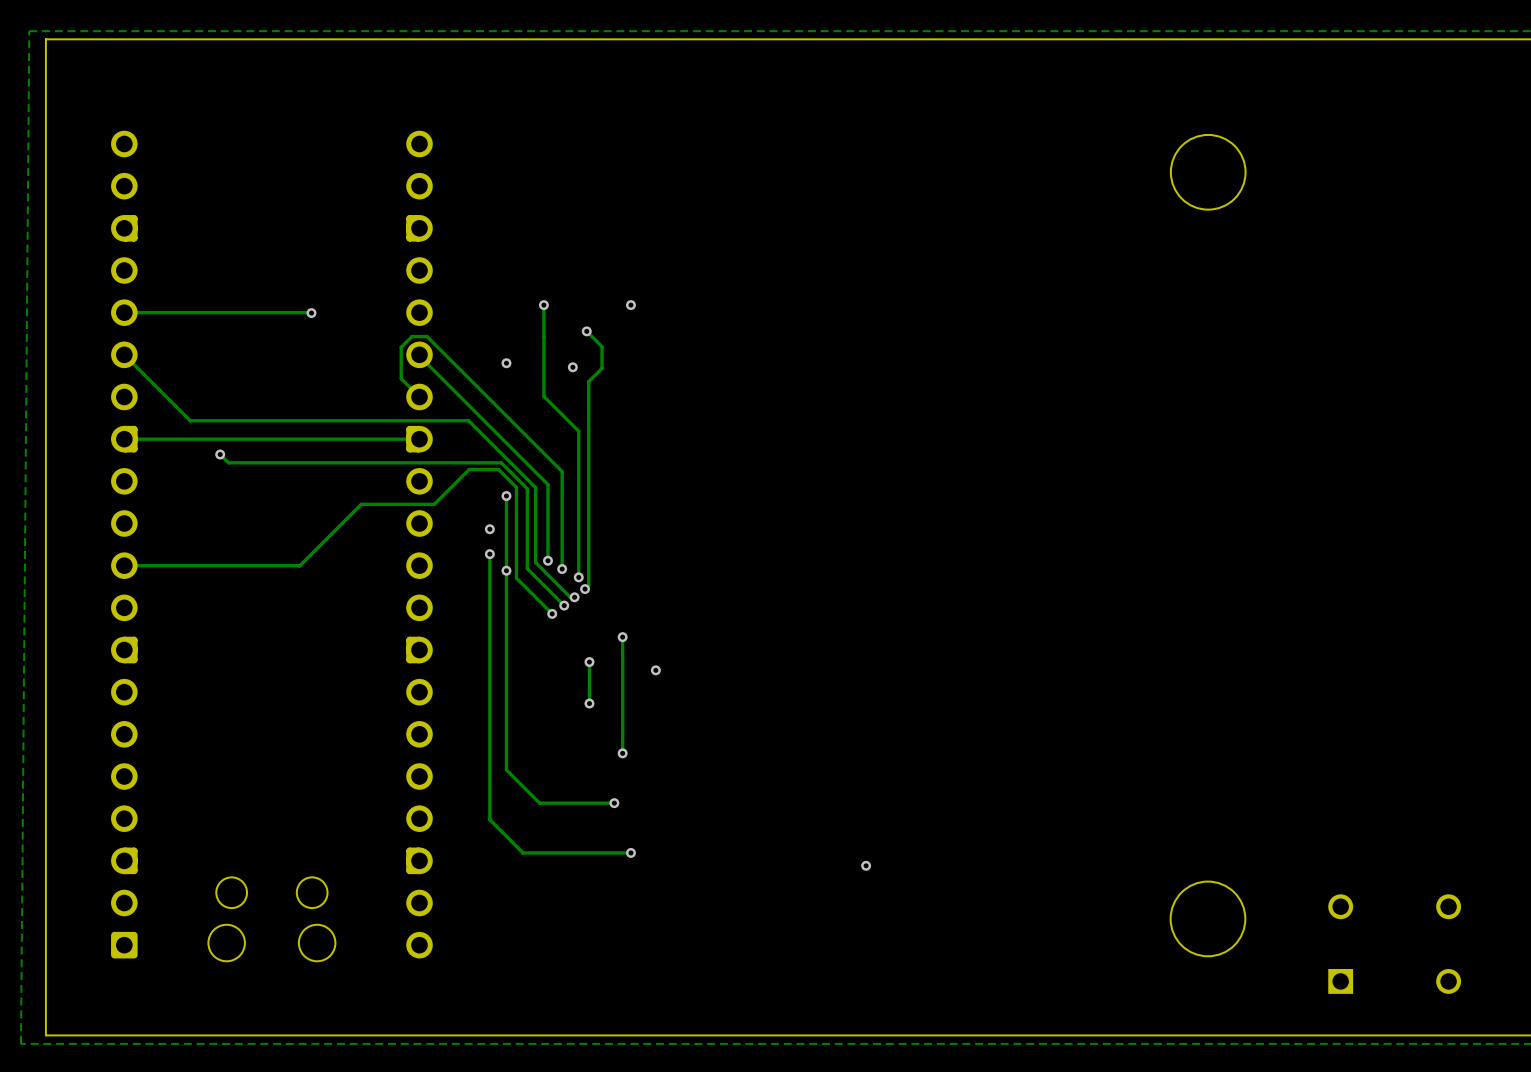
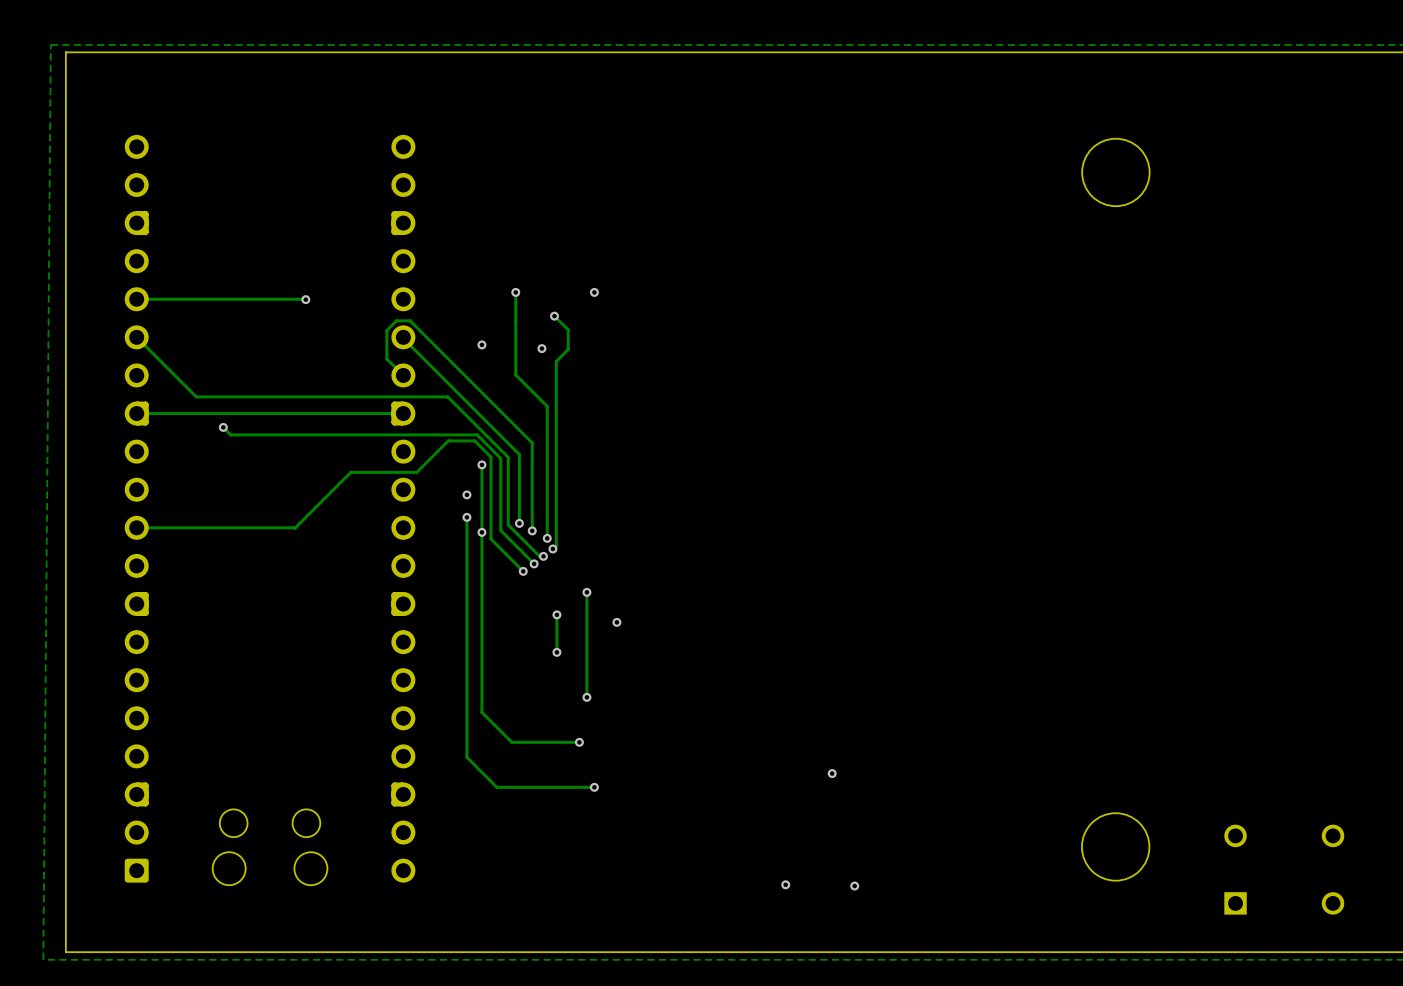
via position: (866, 865) -> (832, 773)
via: none -> (785, 884)
via: none -> (854, 886)

